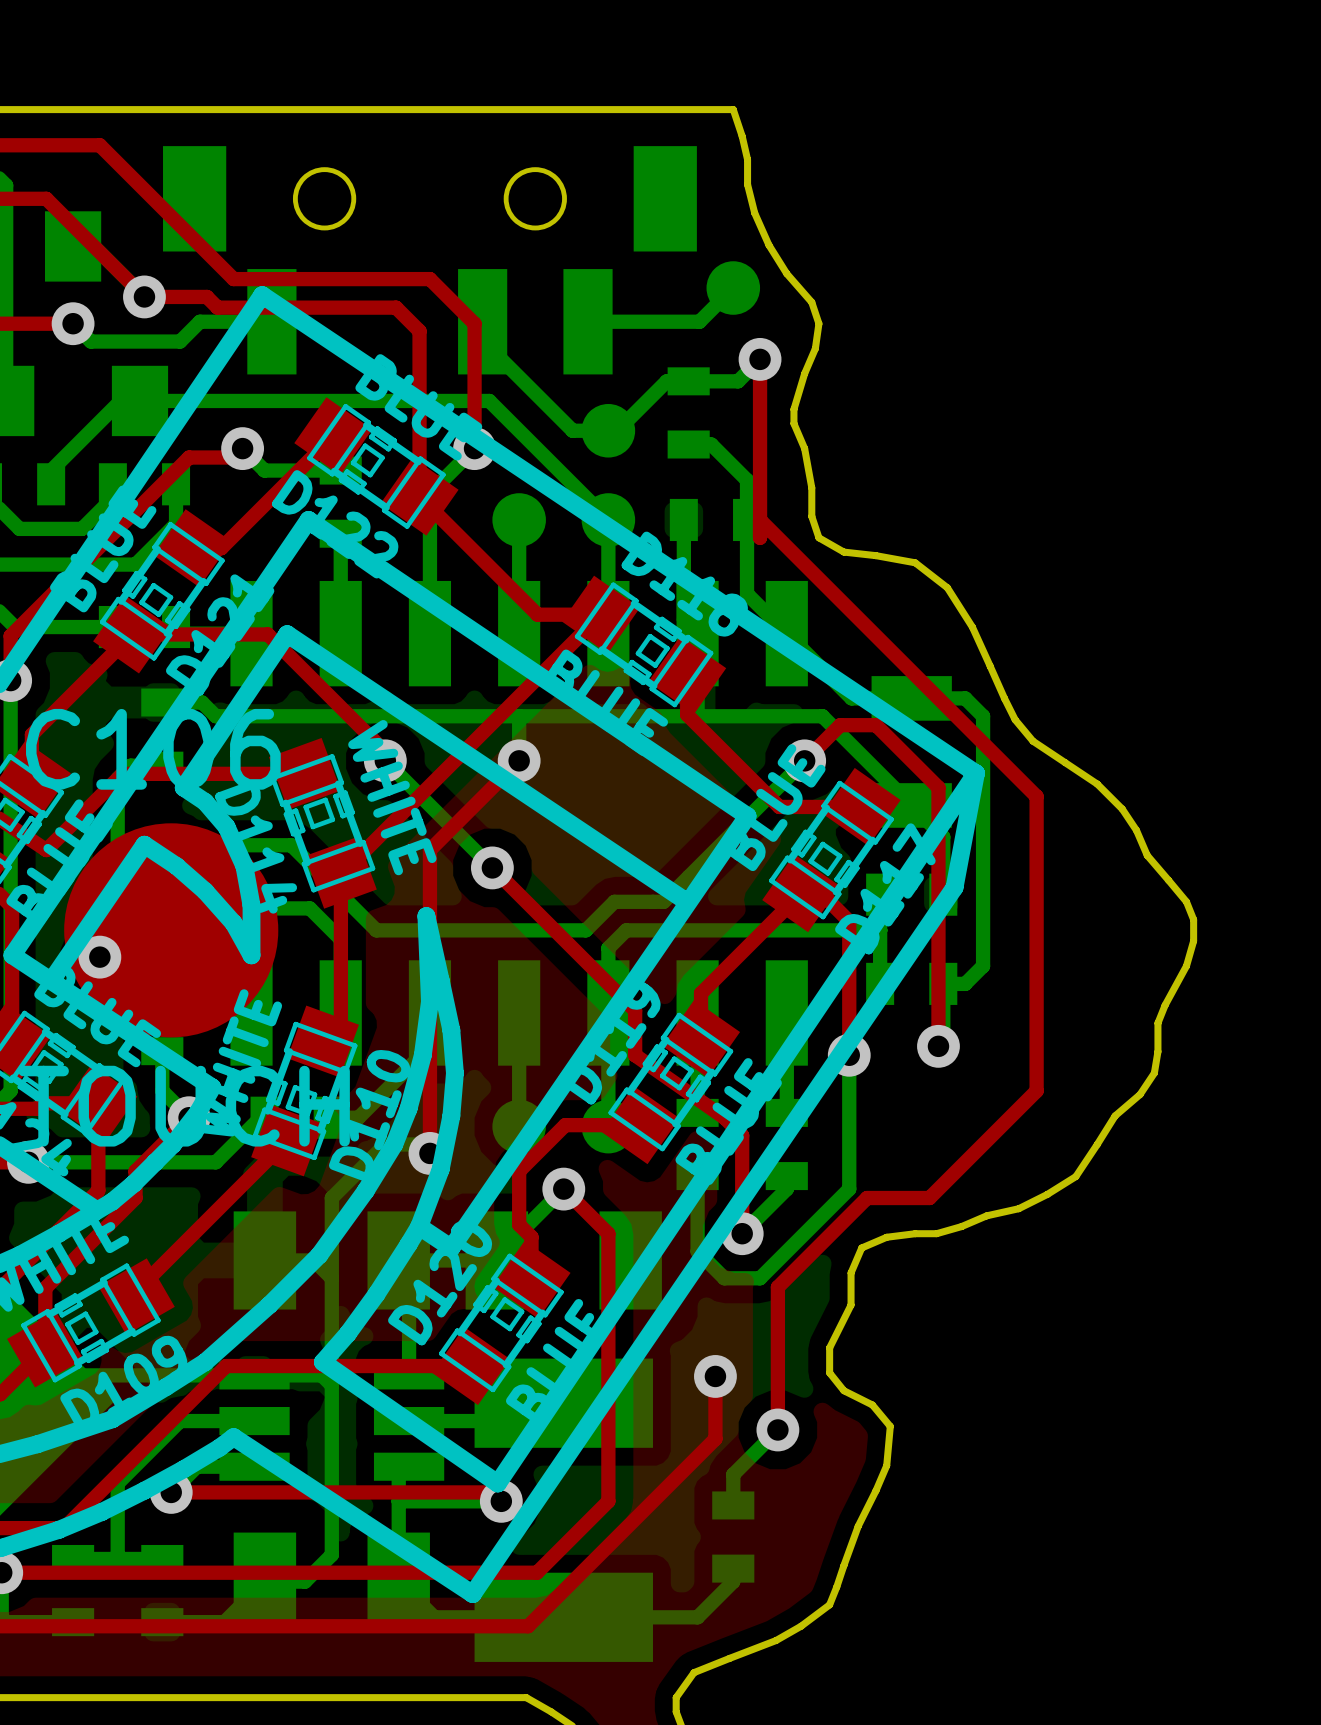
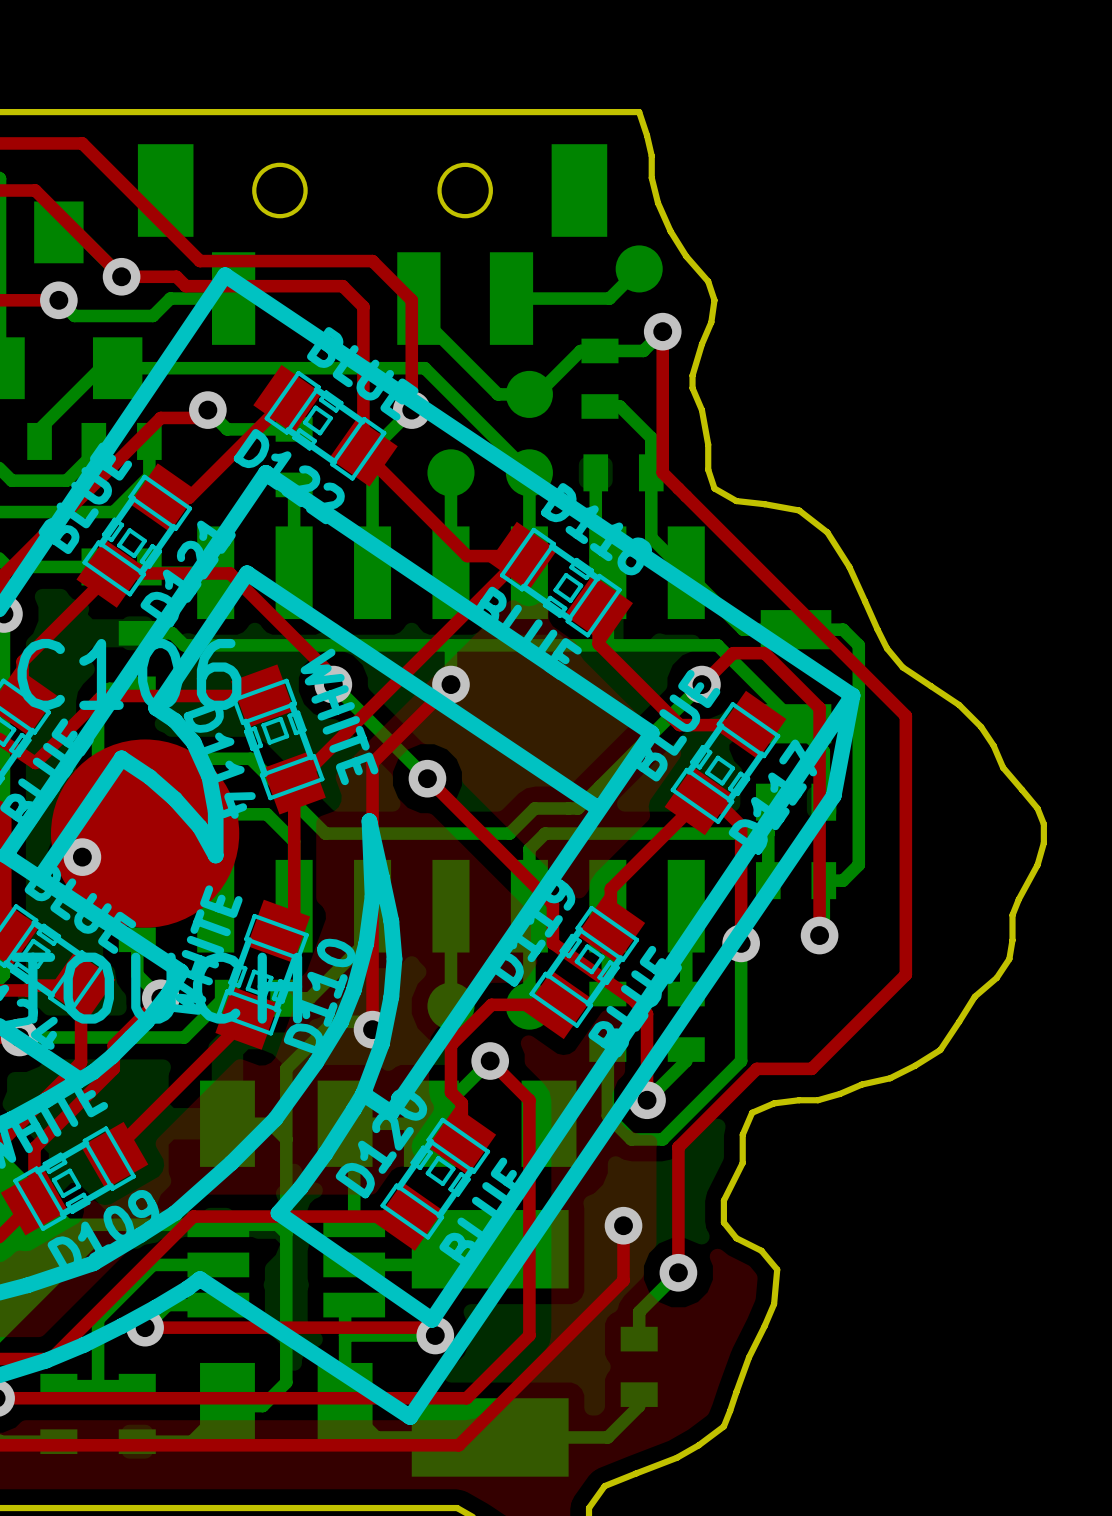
top track: (760, 519) (760, 537) -> none

